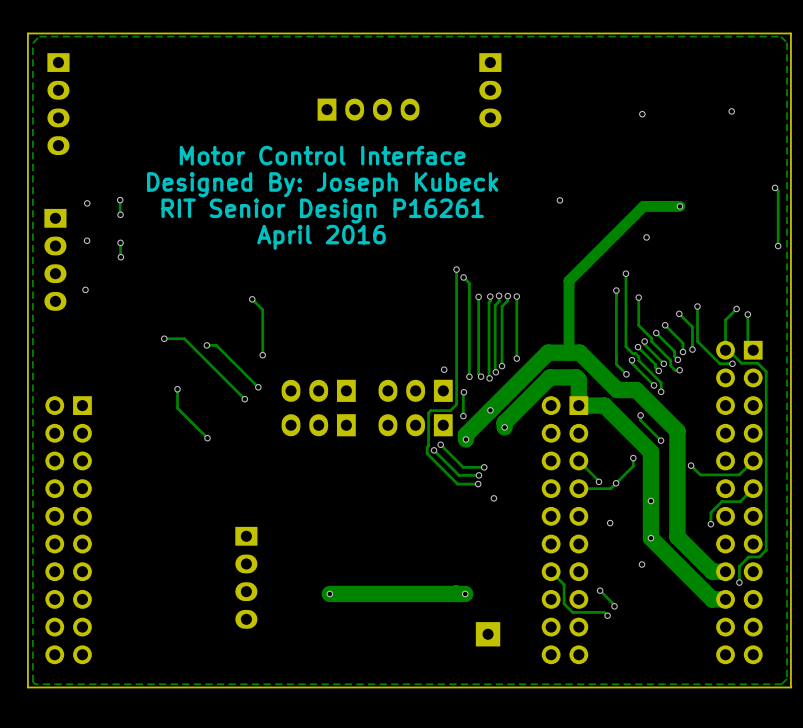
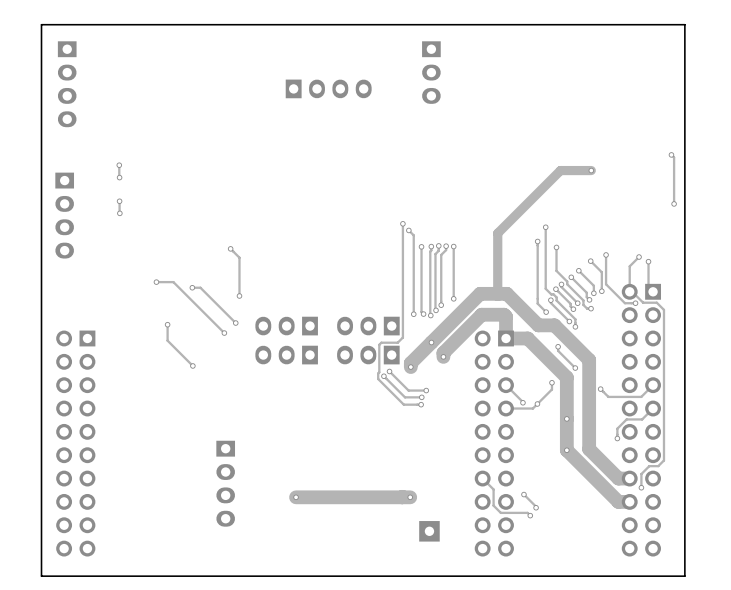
via: (731, 111) -> none
via: (642, 114) -> none
text: Motor Control Interface (322, 155) -> none
text: Designed By: Joseph Kubeck (322, 184) -> none
via: (559, 200) -> none
via: (87, 203) -> none
text: RIT Senior Design P16261 (322, 211) -> none
text: April 2016 (321, 237) -> none
via: (646, 237) -> none
via: (87, 240) -> none
via: (85, 289) -> none
via: (444, 369) -> none
track: (463, 392) (463, 416) -> none
via: (463, 392) -> none
via: (463, 416) -> none
via: (493, 498) -> none
via: (610, 523) -> none
via: (642, 564) -> none
zone outline: (33, 682) (35, 684) (781, 684) (787, 678) (787, 42) (780, 36) (39, 36) (32, 43) (32, 682) -> none

